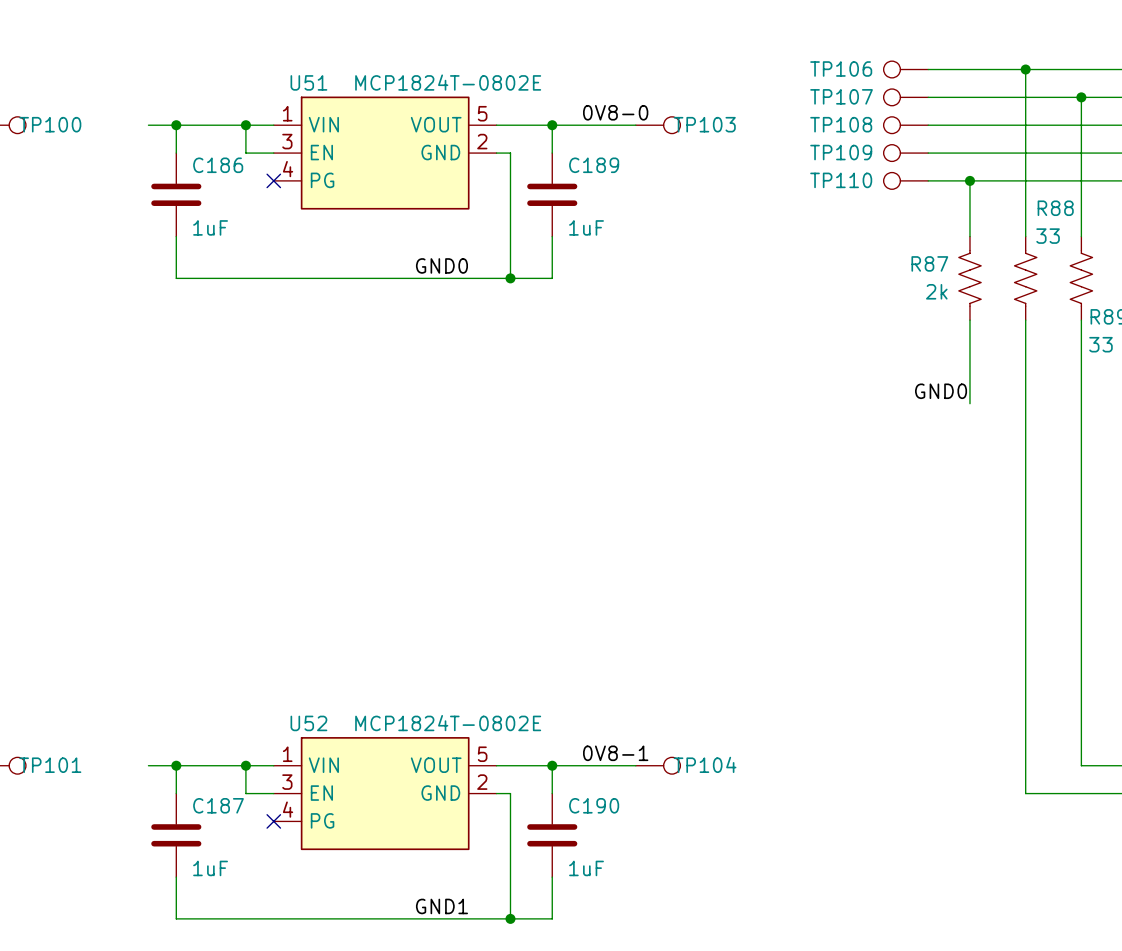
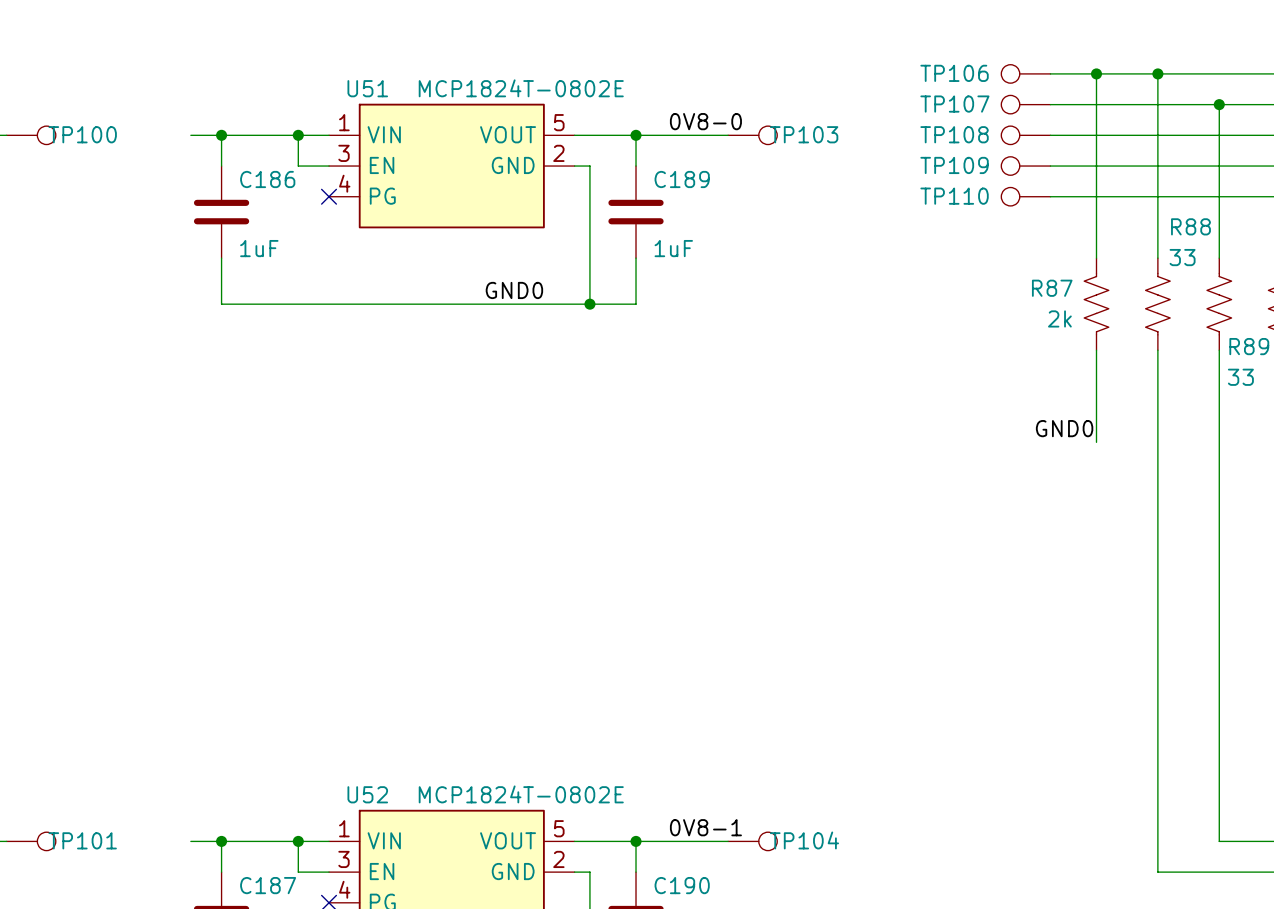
wire: none -> (1096, 73) (1096, 196)
junction: none -> (1096, 73)
junction: (969, 180) -> none

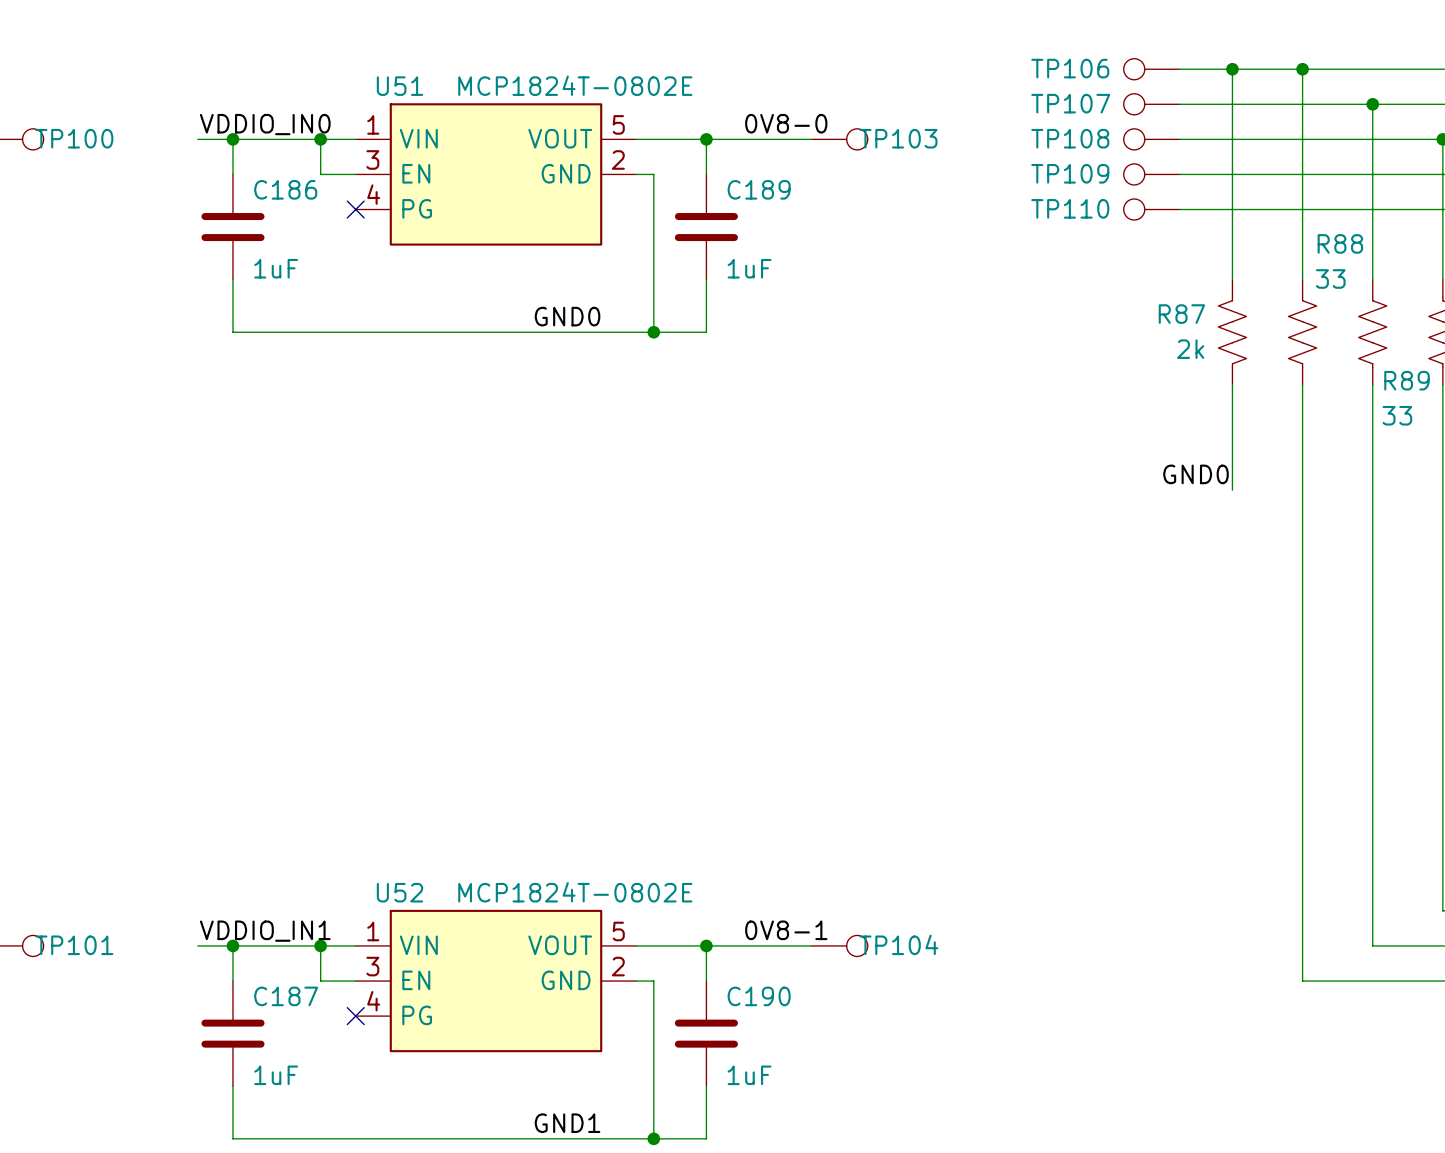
label: none -> VDDIO_IN0 (265, 124)
label: none -> VDDIO_IN1 (265, 931)

